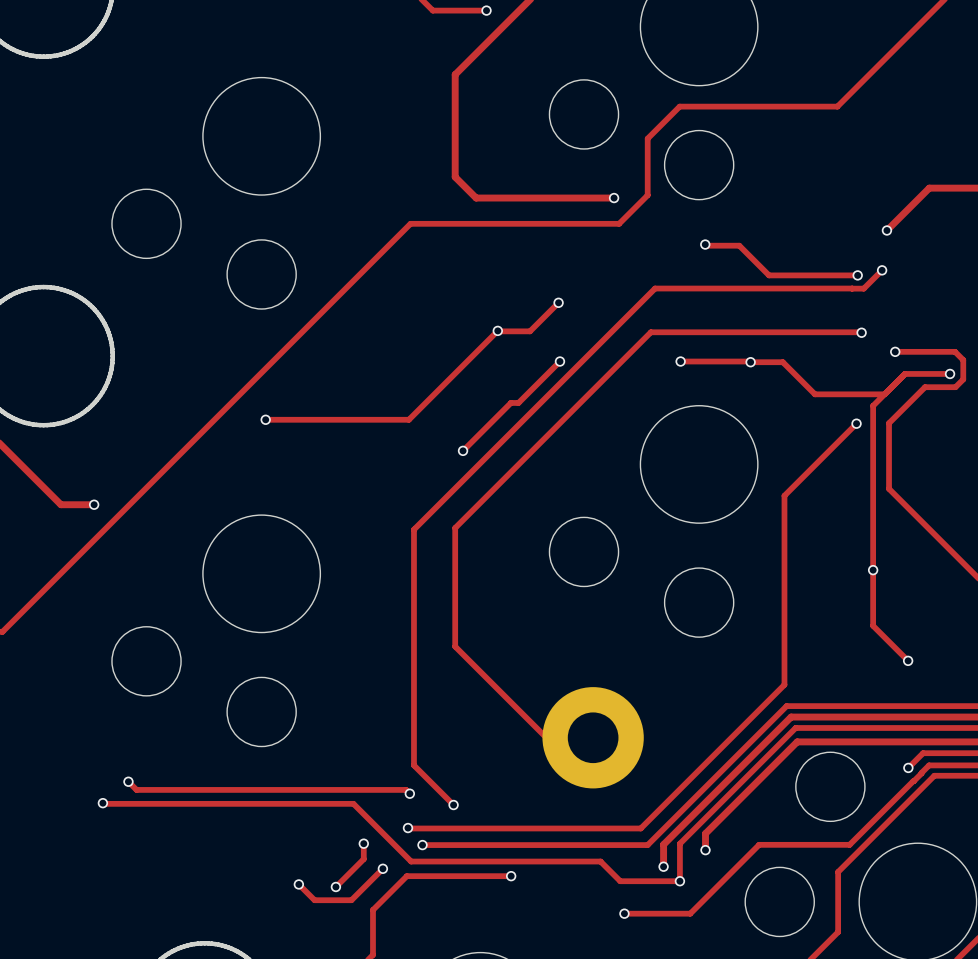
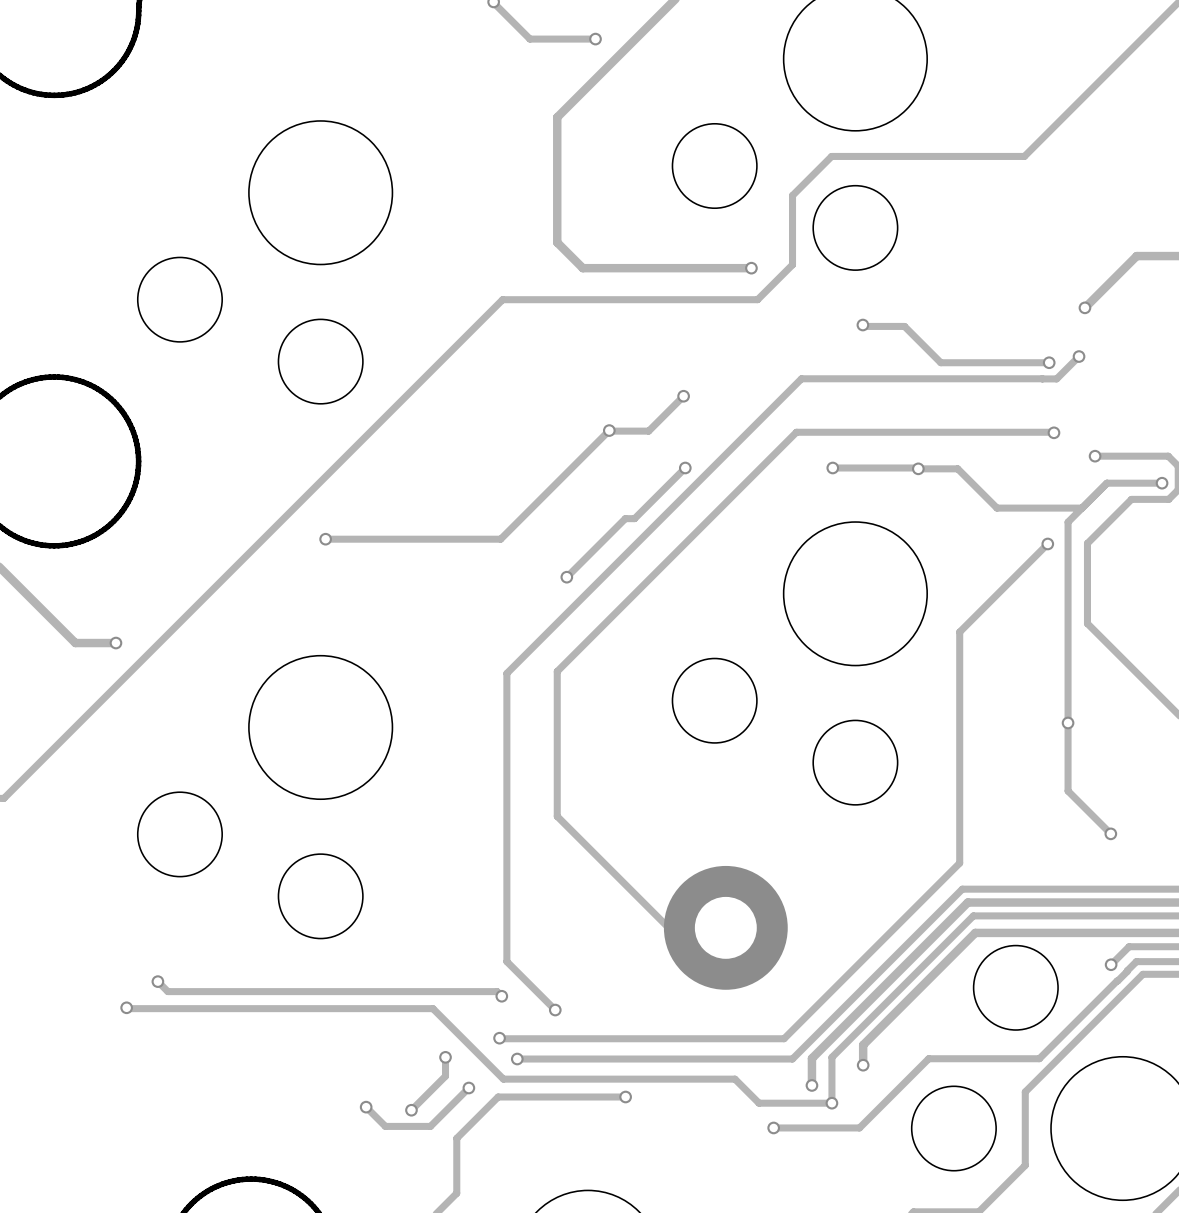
track: (702, 901) (690, 913) (624, 913) -> (859, 1127) (773, 1127)
via position: (624, 913) -> (773, 1127)

